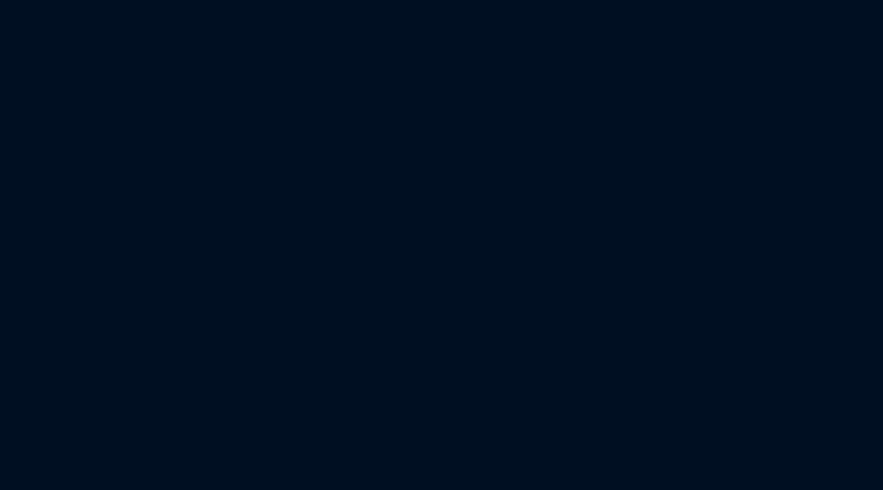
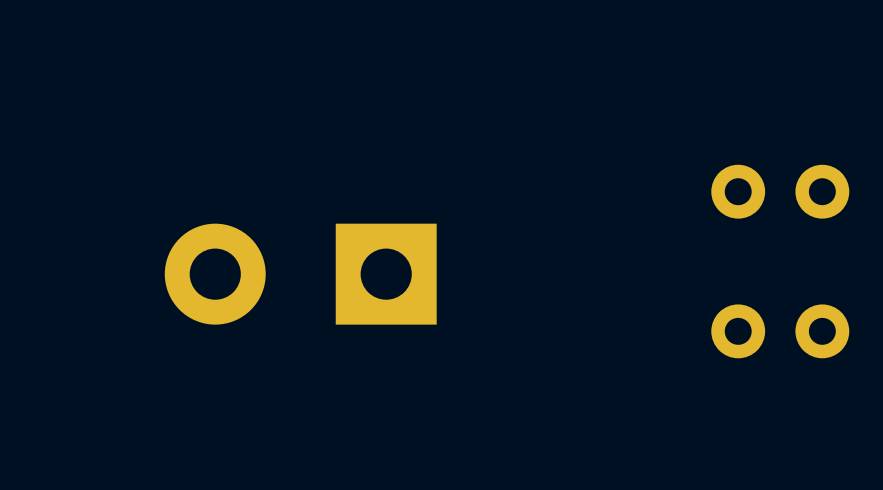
part: none -> (780, 191)
part: none -> (300, 274)
part: none -> (780, 331)

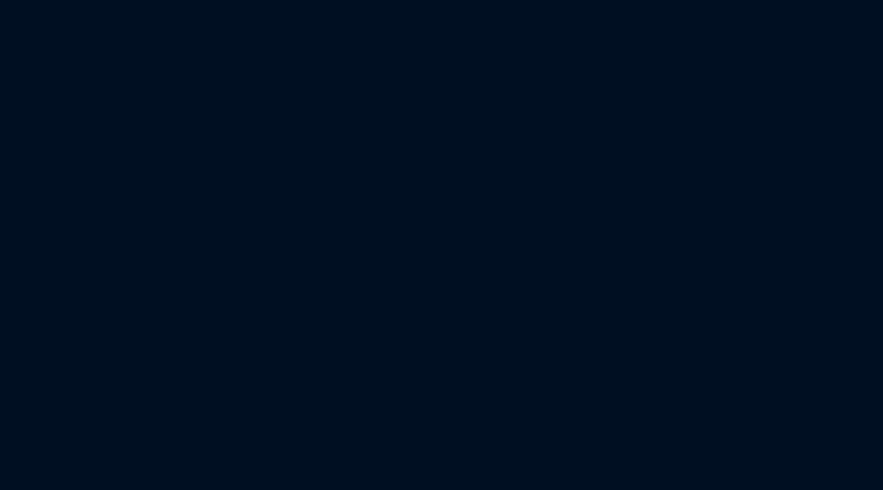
part: (780, 191) -> none
part: (300, 274) -> none
part: (780, 331) -> none

